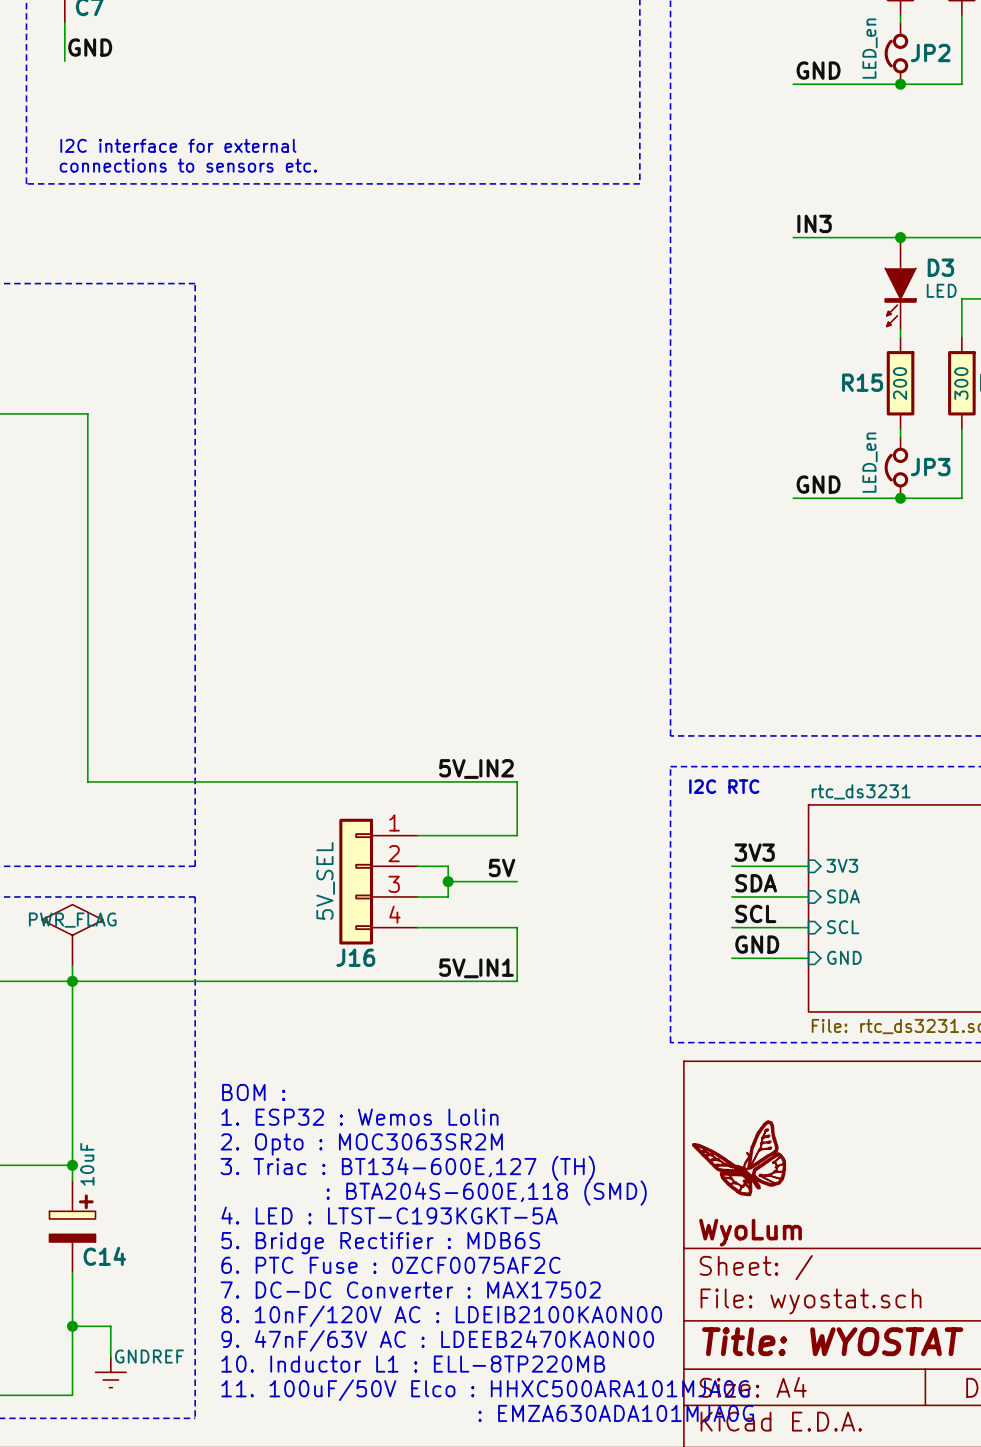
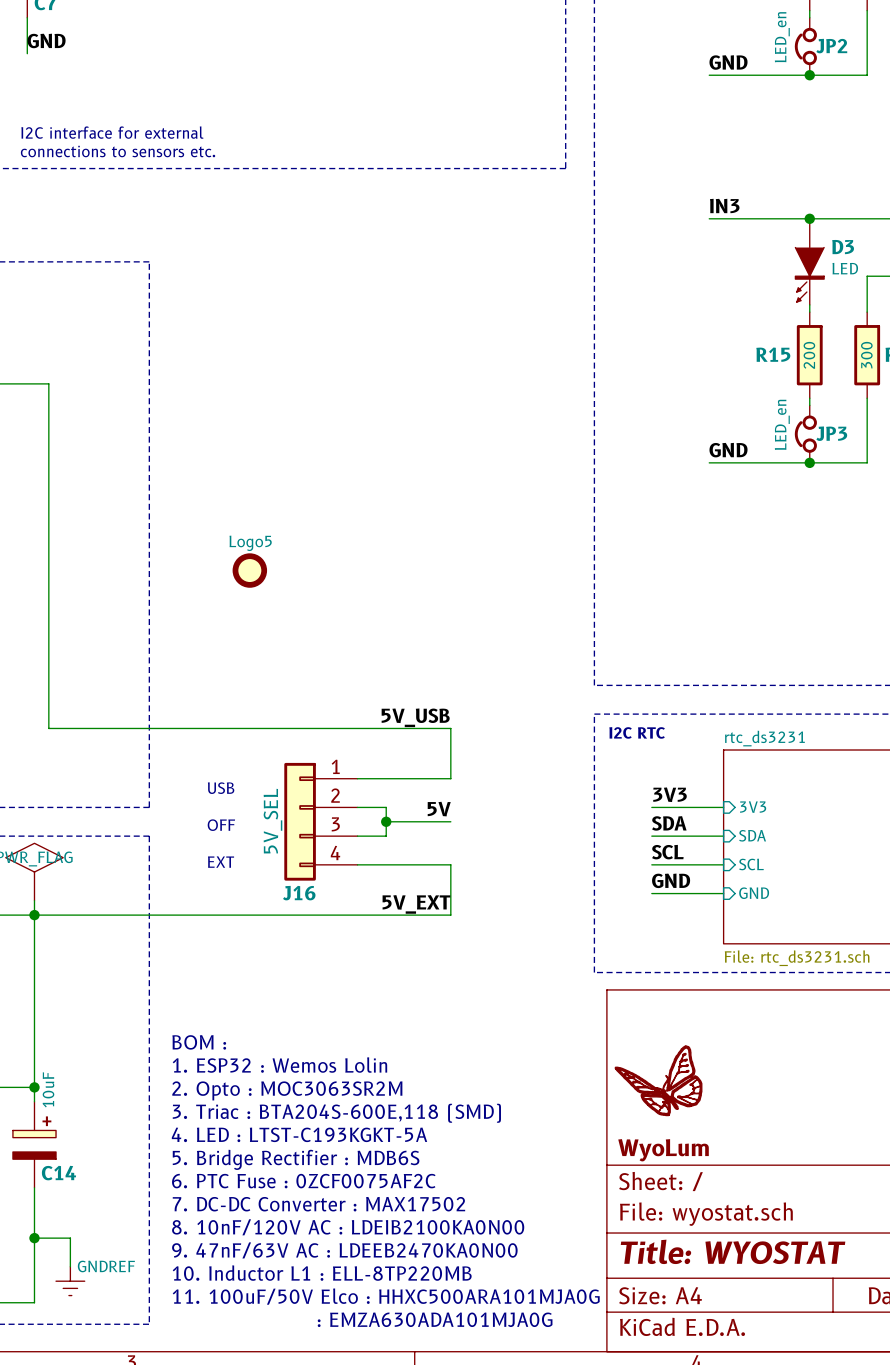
Logo5: none -> (249, 570)
label: 5V_IN2 (476, 769) -> 5V_USB (415, 717)
text: none -> USB (221, 788)
text: none -> OFF (221, 825)
text: none -> EXT (221, 862)
label: 5V_IN1 (476, 968) -> 5V_EXT (416, 904)
text: BOM : (253, 1092) -> none
text: 1. ESP32 : Wemos Lolin (359, 1117) -> BOM : (199, 1042)
text: 2. Opto : MOC3063SR2M (361, 1144) -> 1. ESP32 : Wemos Lolin (279, 1065)
text: 3. Triac : BT134-600E,127 (TH) (407, 1168) -> 2. Opto : MOC3063SR2M (287, 1090)
text: : BTA204S-600E,118 (SMD) (486, 1193) -> 3. Triac : BTA204S-600E,118 (SMD) (336, 1113)

